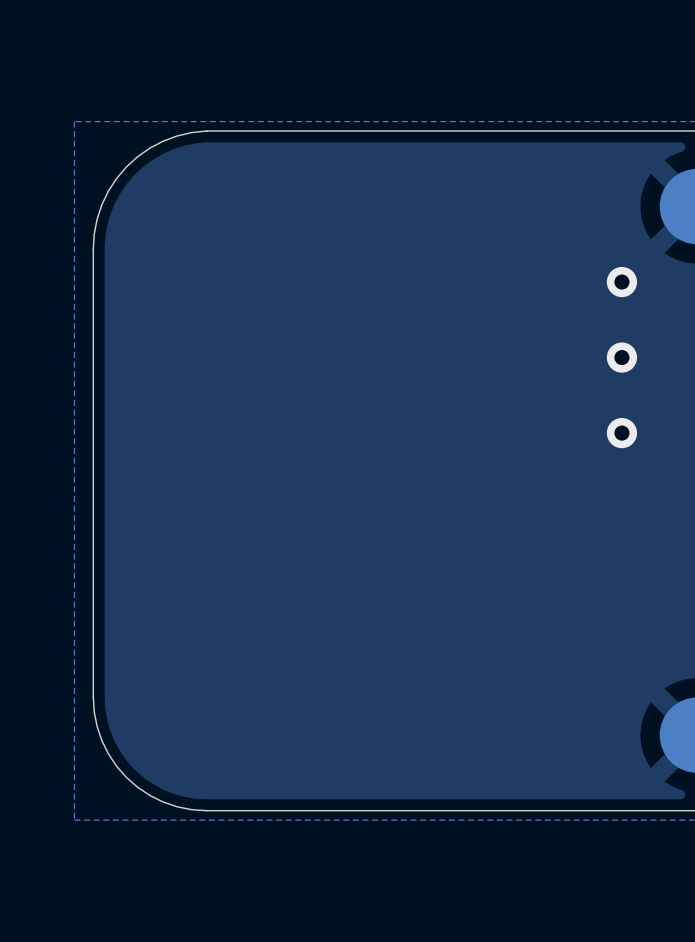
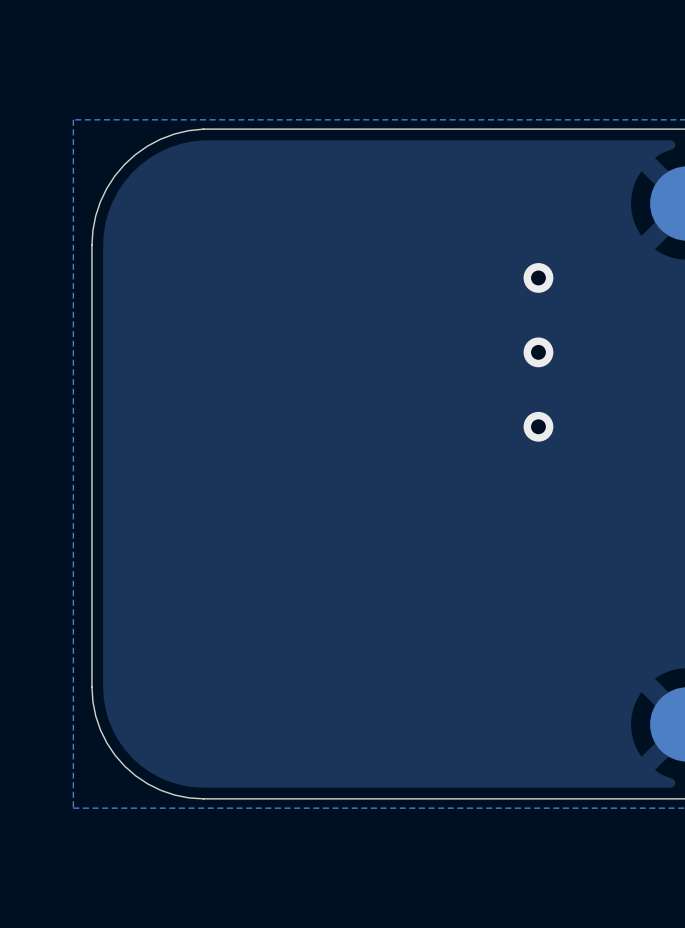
via: none -> (538, 277)
via: (621, 282) -> none
via: none -> (538, 352)
via: (621, 357) -> none
via: none -> (538, 426)
via: (621, 433) -> none

